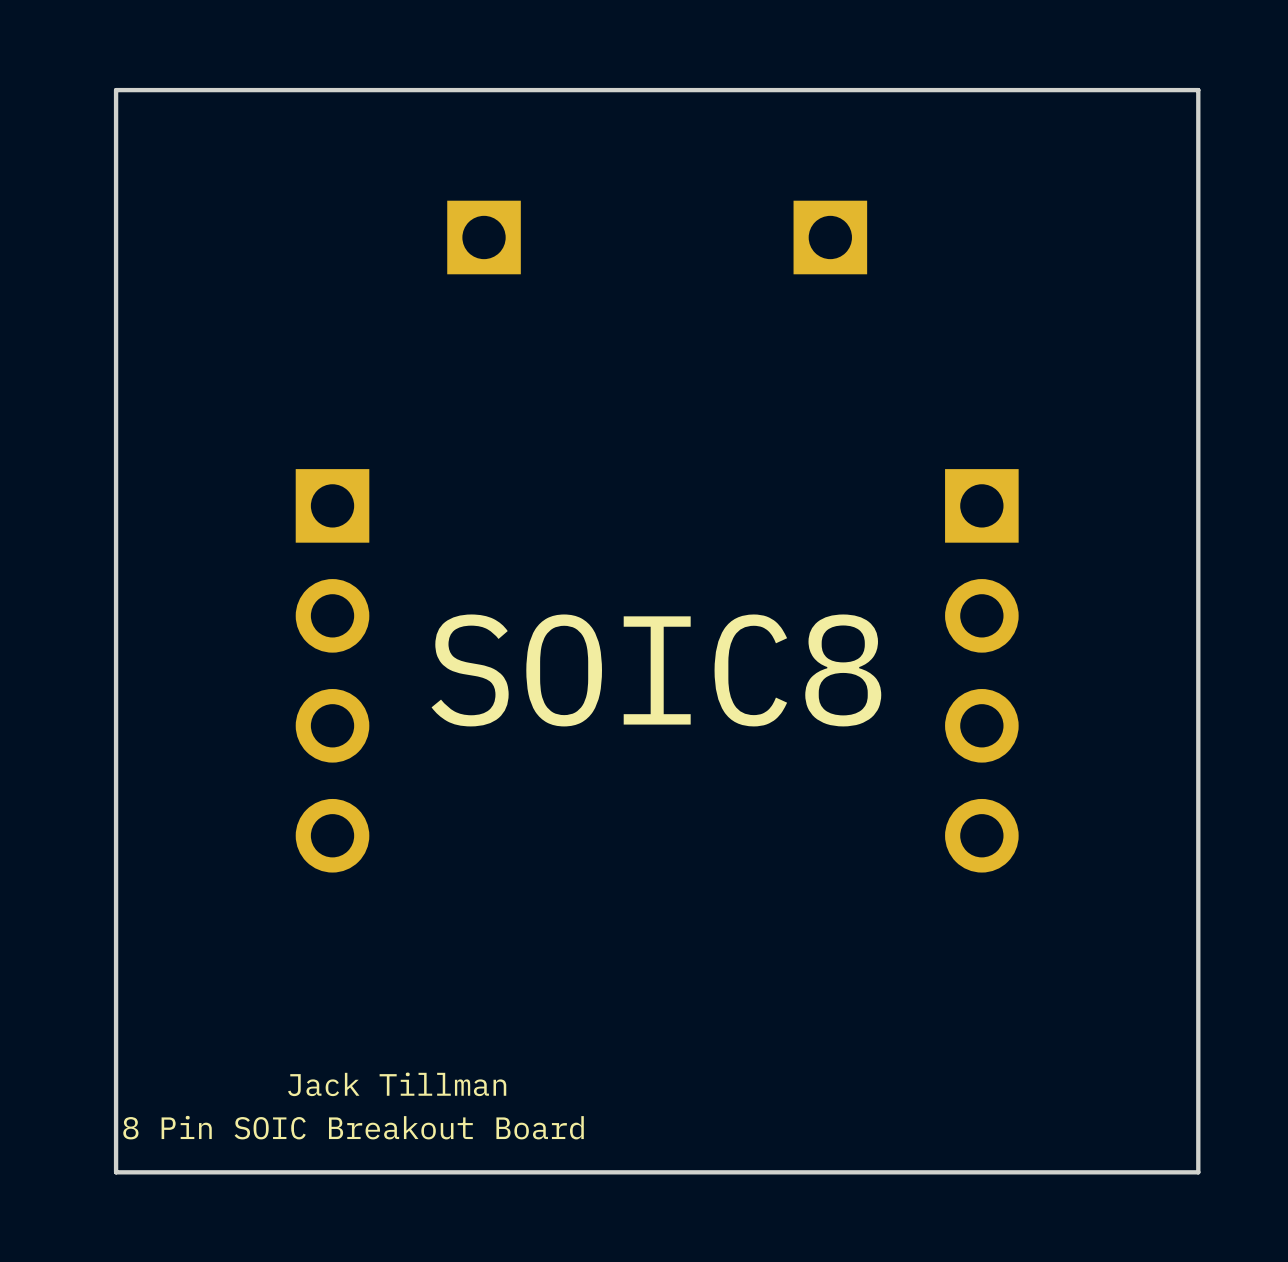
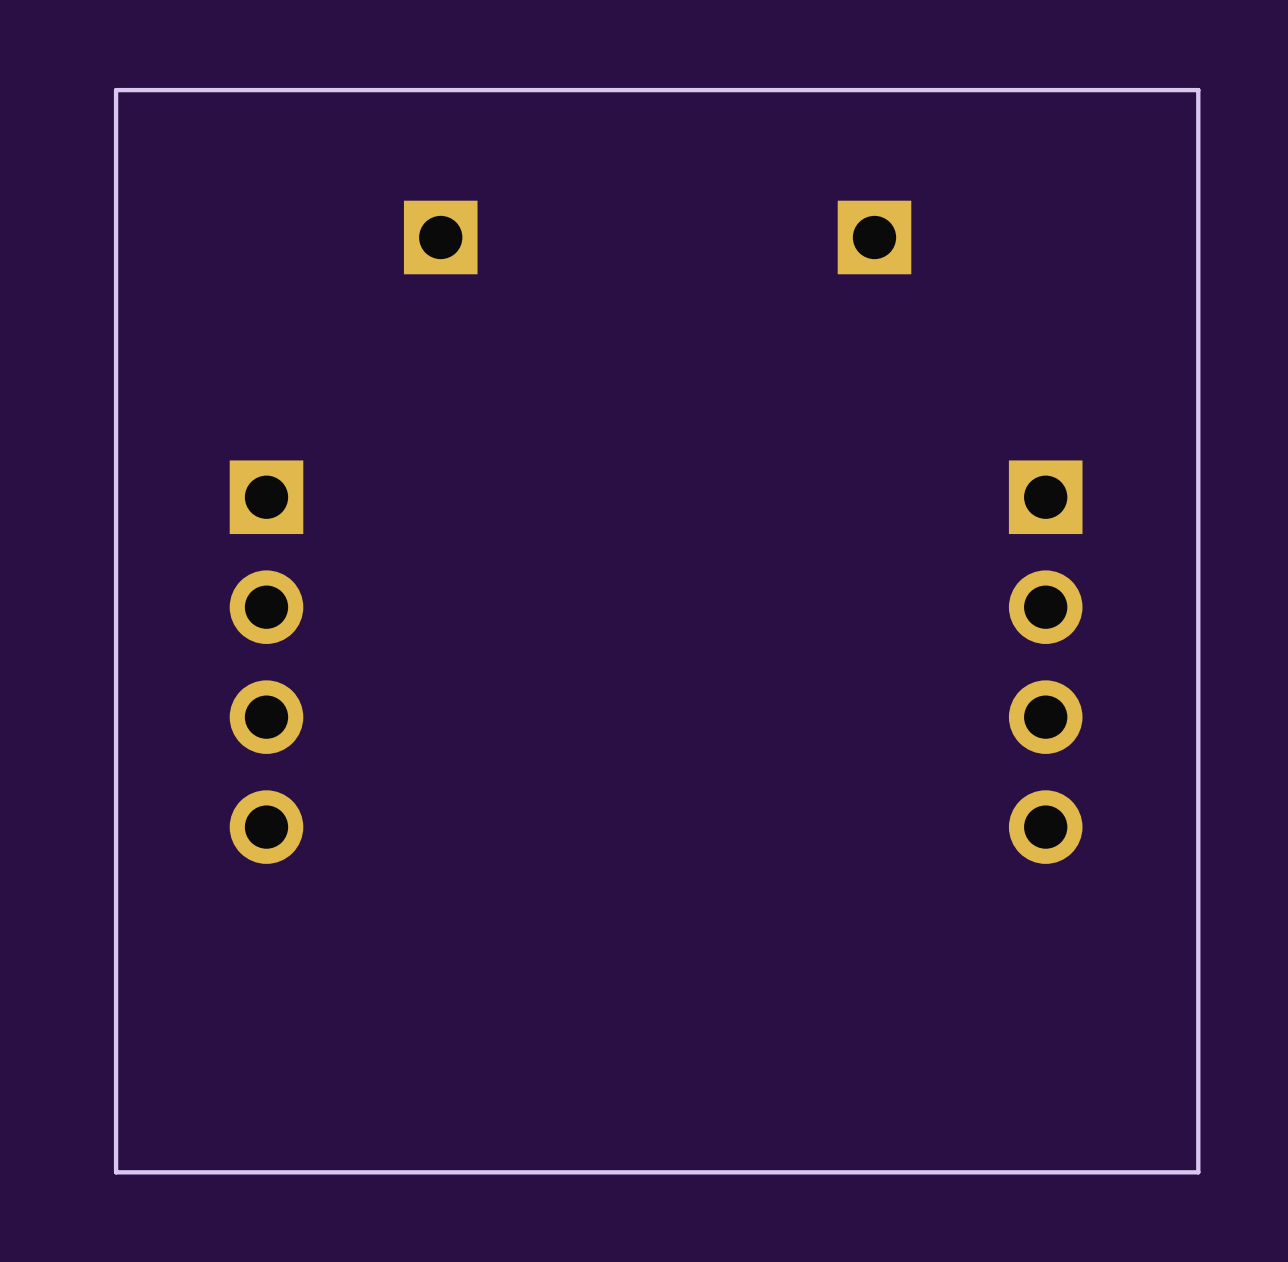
part position: (484, 237) -> (440, 237)
part position: (830, 237) -> (874, 237)
part position: (332, 670) -> (266, 662)
SOIC8: (656, 670) -> none
part position: (981, 670) -> (1045, 662)
text: Jack Tillman (397, 1084) -> none
text: 8 Pin SOIC Breakout Board (353, 1127) -> none

